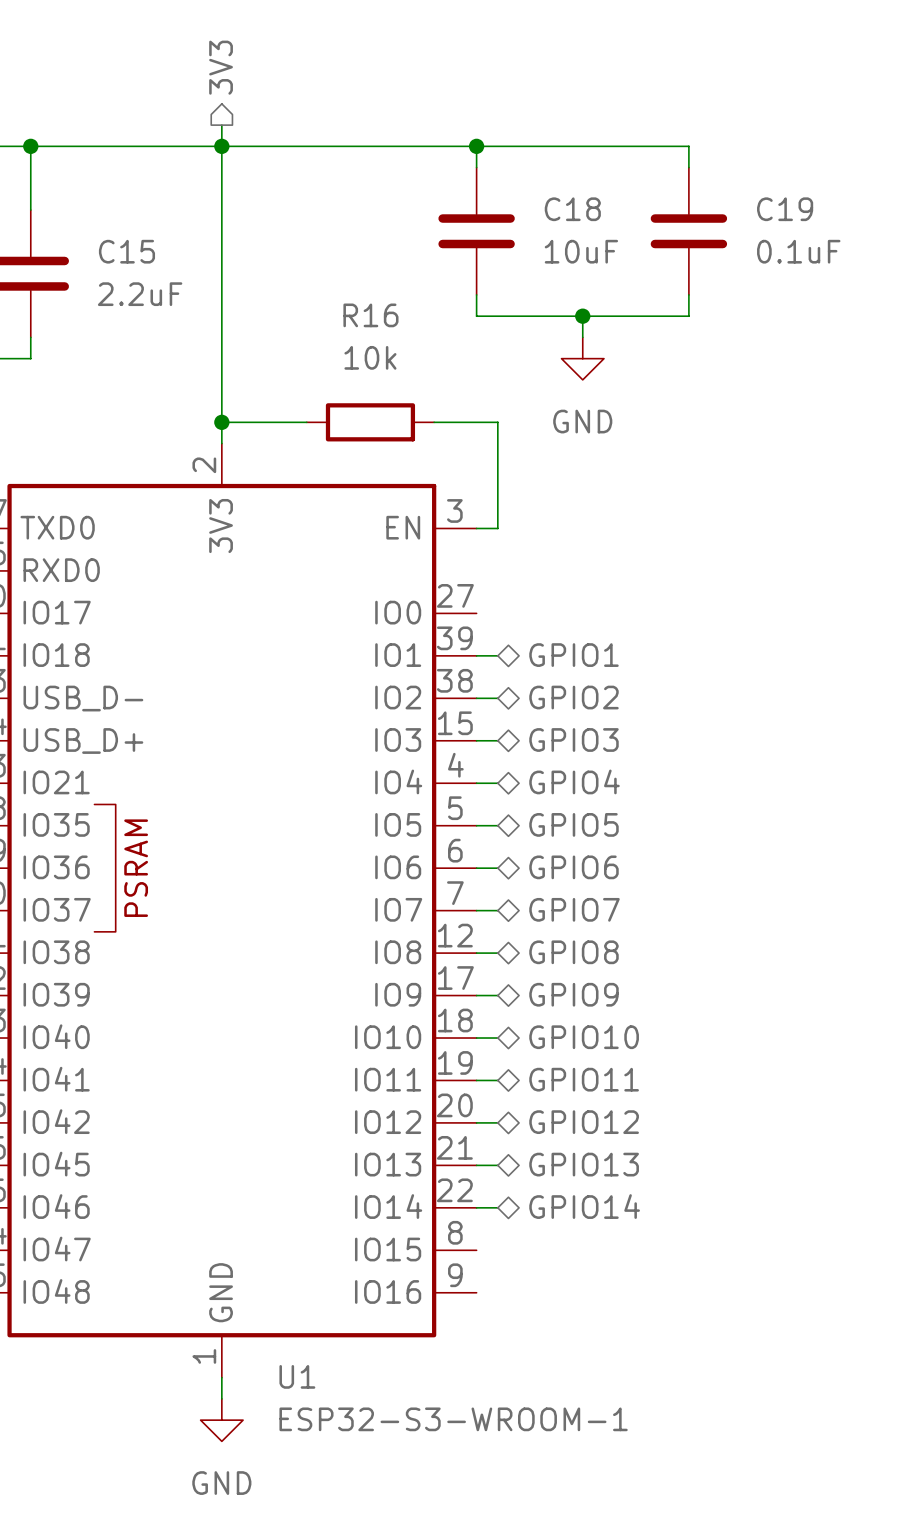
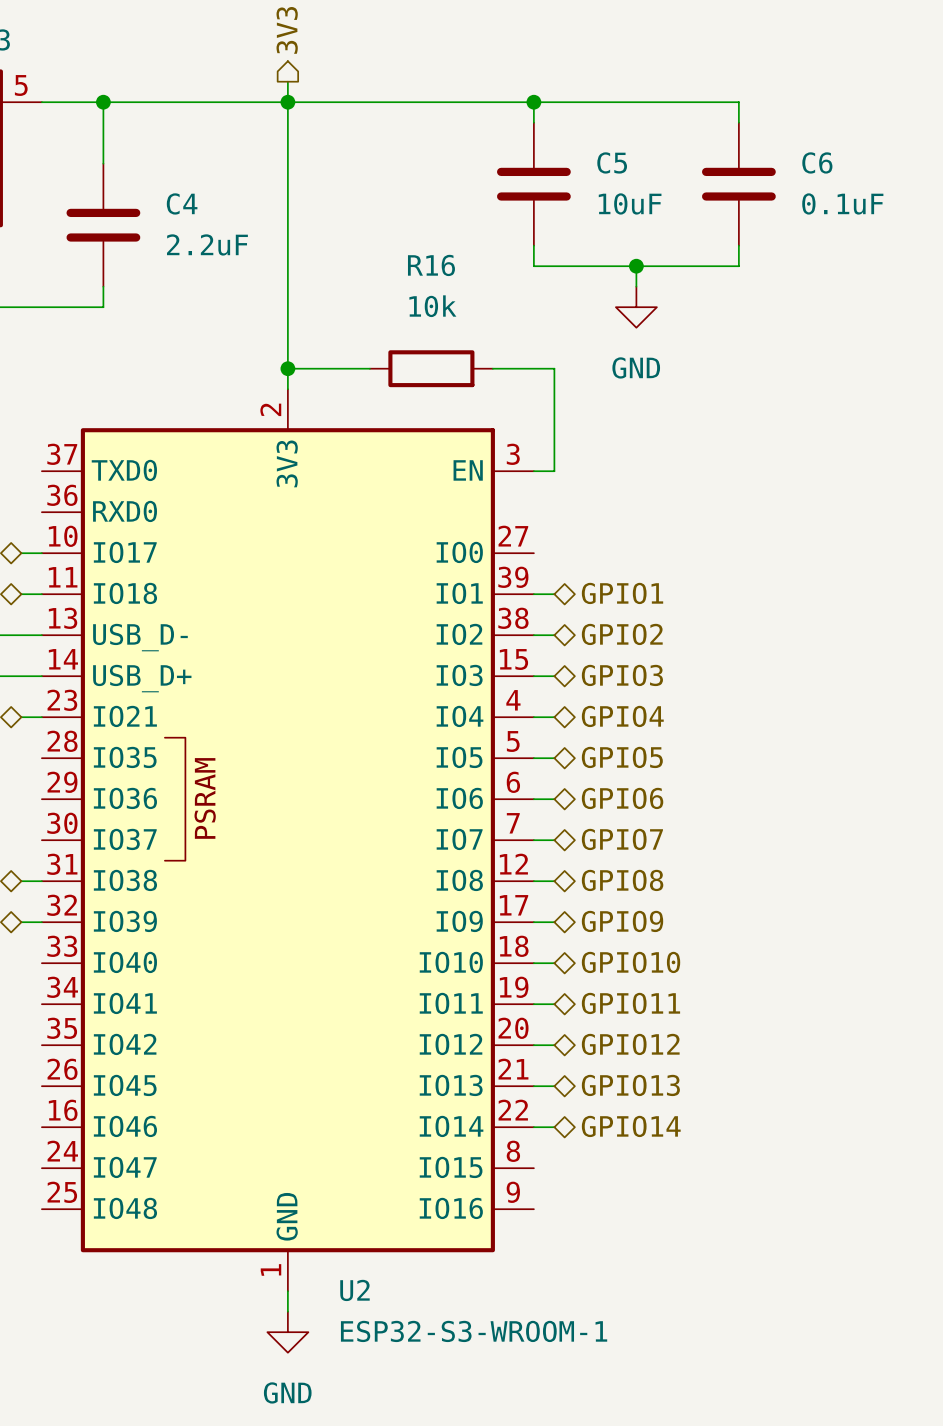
C18 name: C18 (572, 209) -> C5 (612, 162)
C19 name: C19 (785, 209) -> C6 (817, 162)
C15 name: C15 (126, 251) -> C4 (182, 203)
U1 name: U1 (297, 1376) -> U2 (354, 1290)

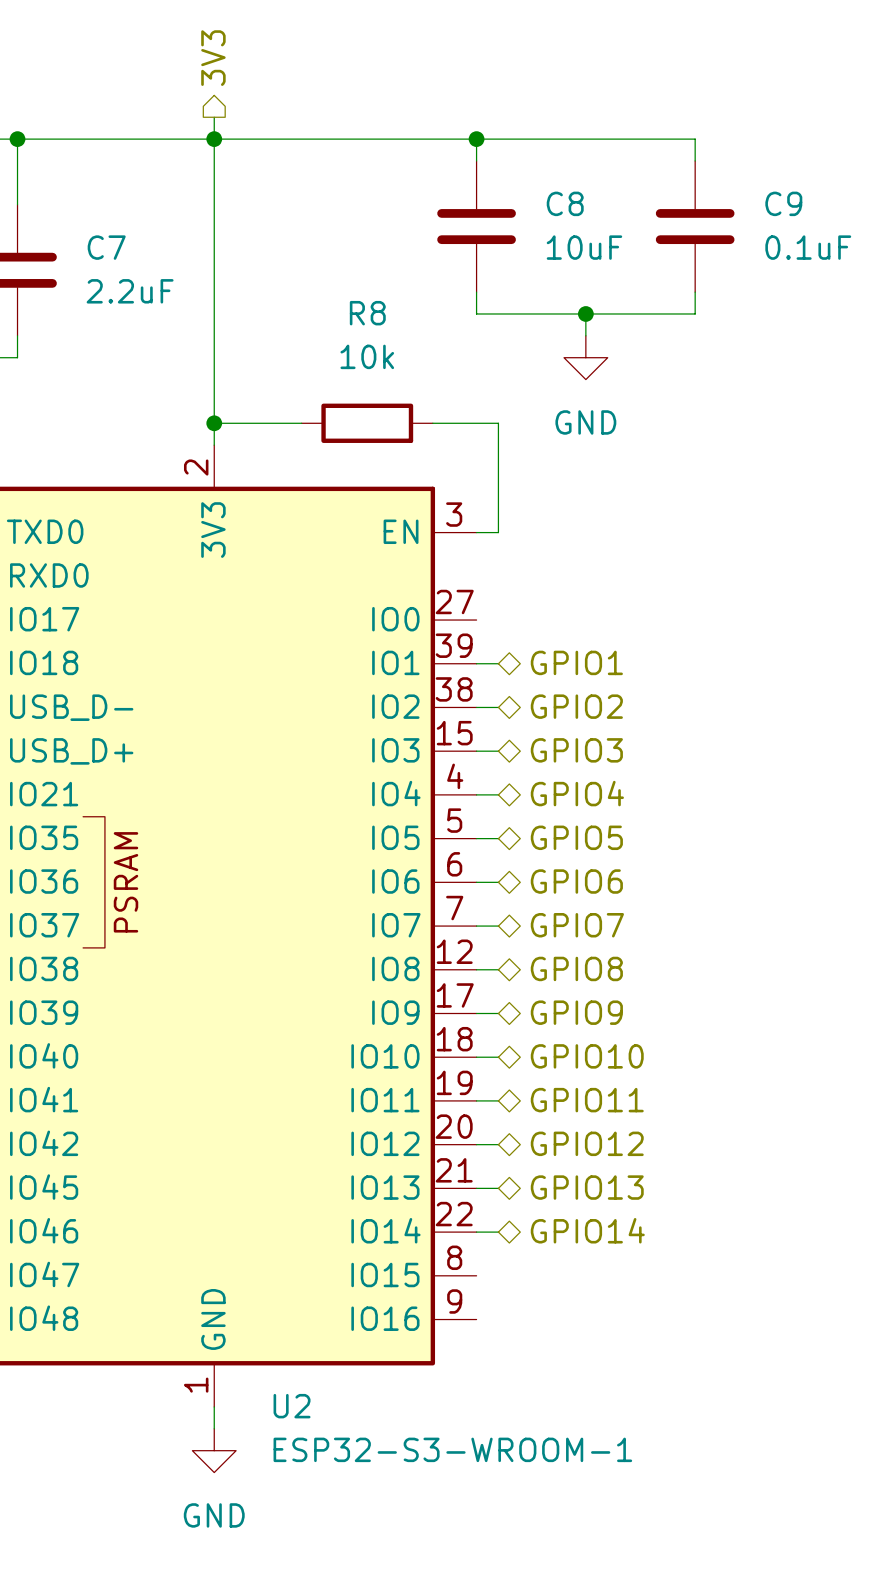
C5 name: C5 (612, 162) -> C8 (565, 203)
C6 name: C6 (817, 162) -> C9 (783, 203)
C4 name: C4 (182, 203) -> C7 (106, 247)
R16 name: R16 (431, 265) -> R8 (367, 313)

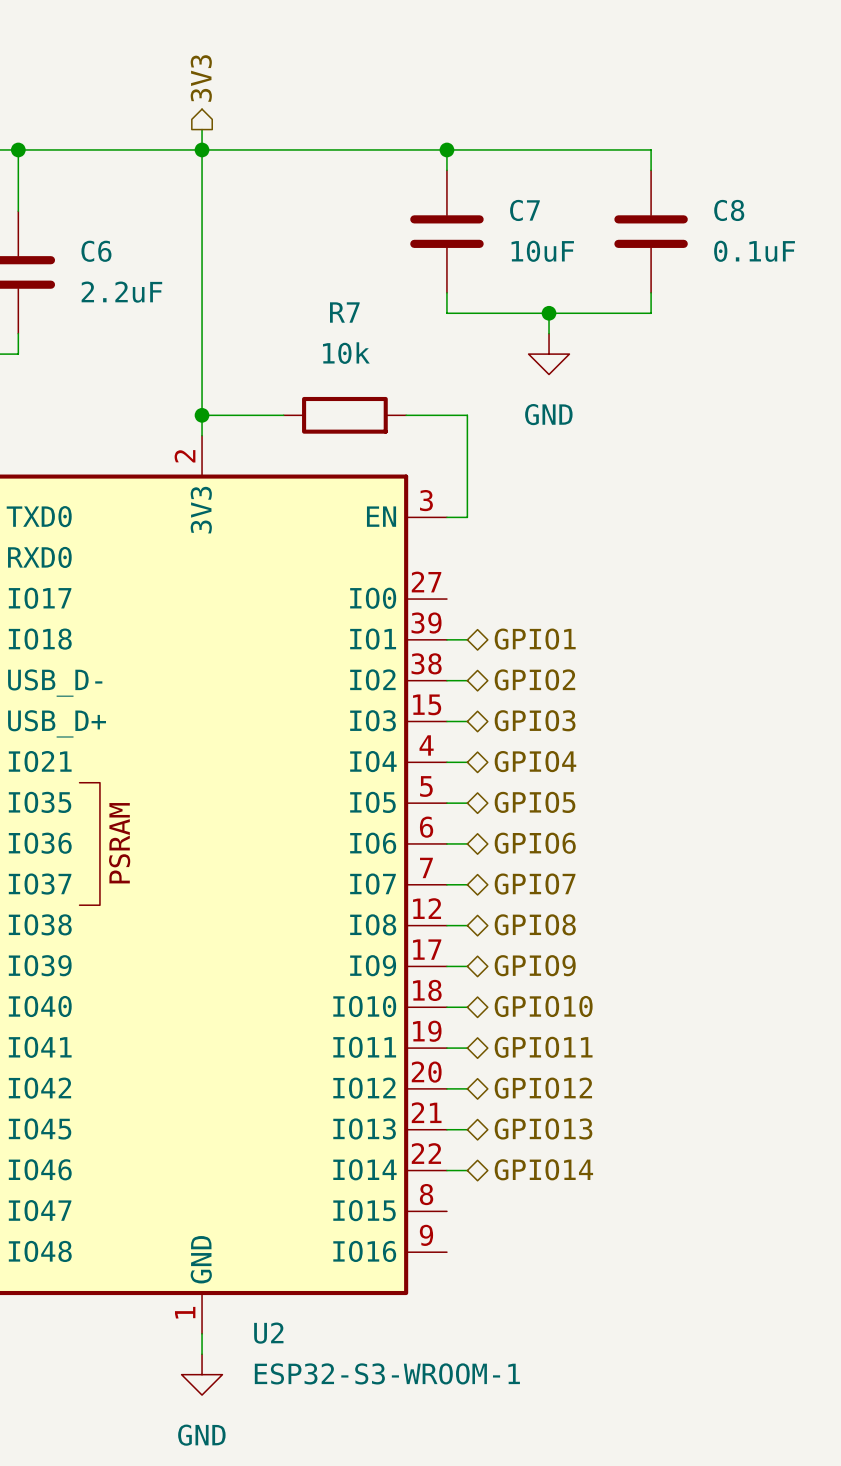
C8 name: C8 (565, 203) -> C7 (524, 210)
C9 name: C9 (783, 203) -> C8 (729, 210)
C7 name: C7 (106, 247) -> C6 (96, 251)
R8 name: R8 (367, 313) -> R7 (344, 312)

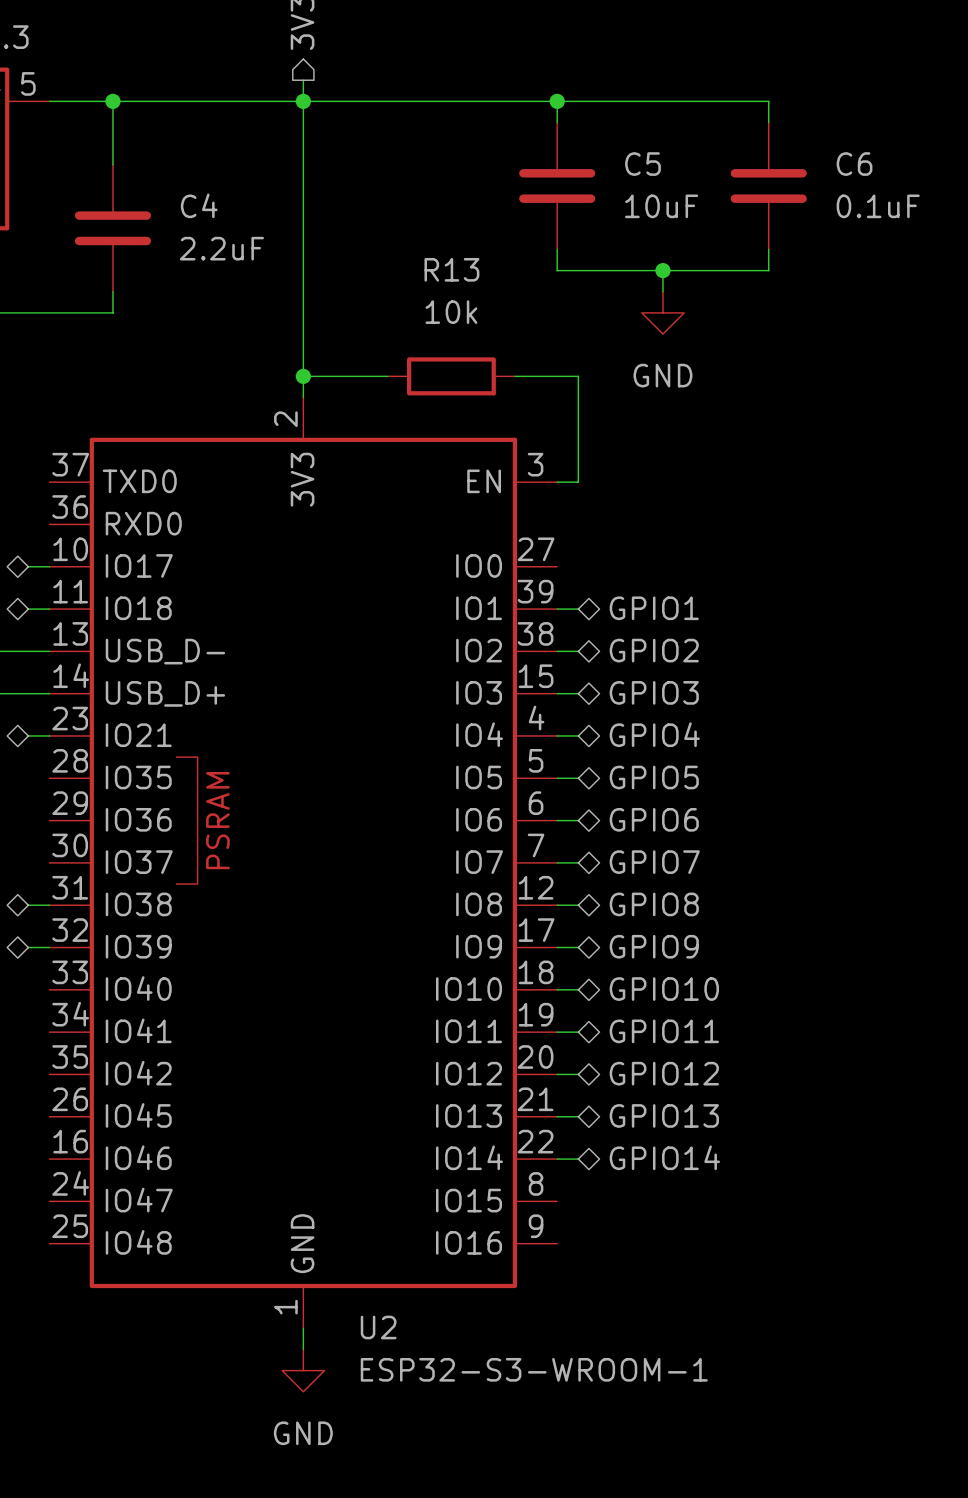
C7 name: C7 (524, 210) -> C5 (642, 164)
C8 name: C8 (729, 210) -> C6 (854, 164)
C6 name: C6 (96, 251) -> C4 (199, 205)
R7 name: R7 (344, 312) -> R13 (451, 269)

